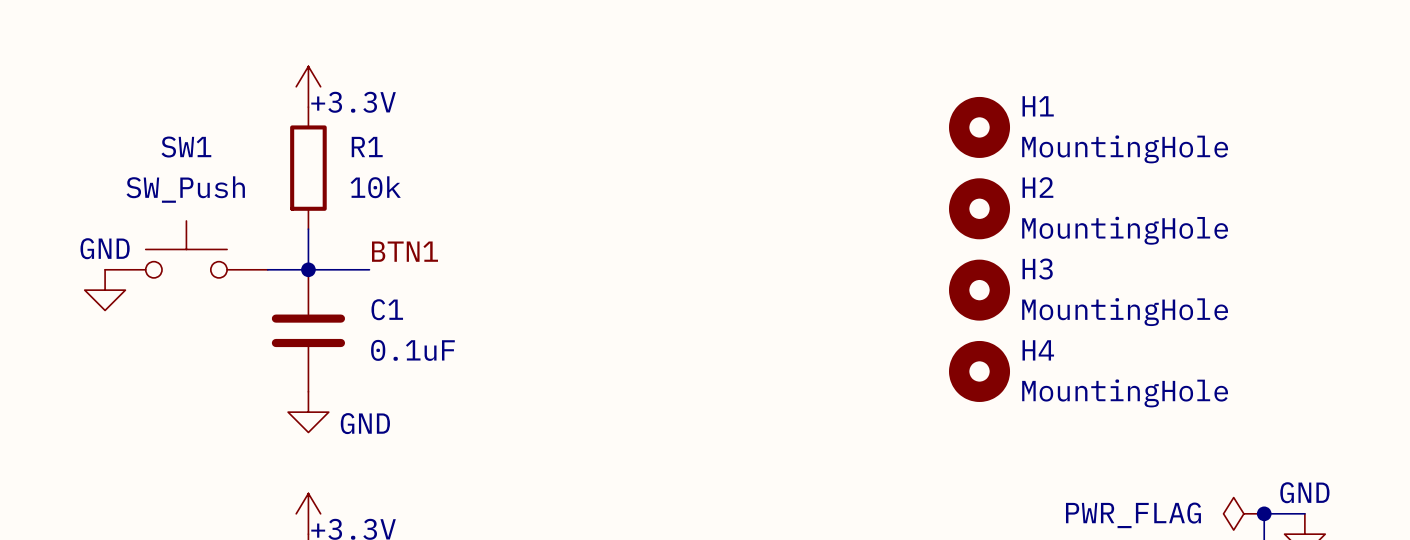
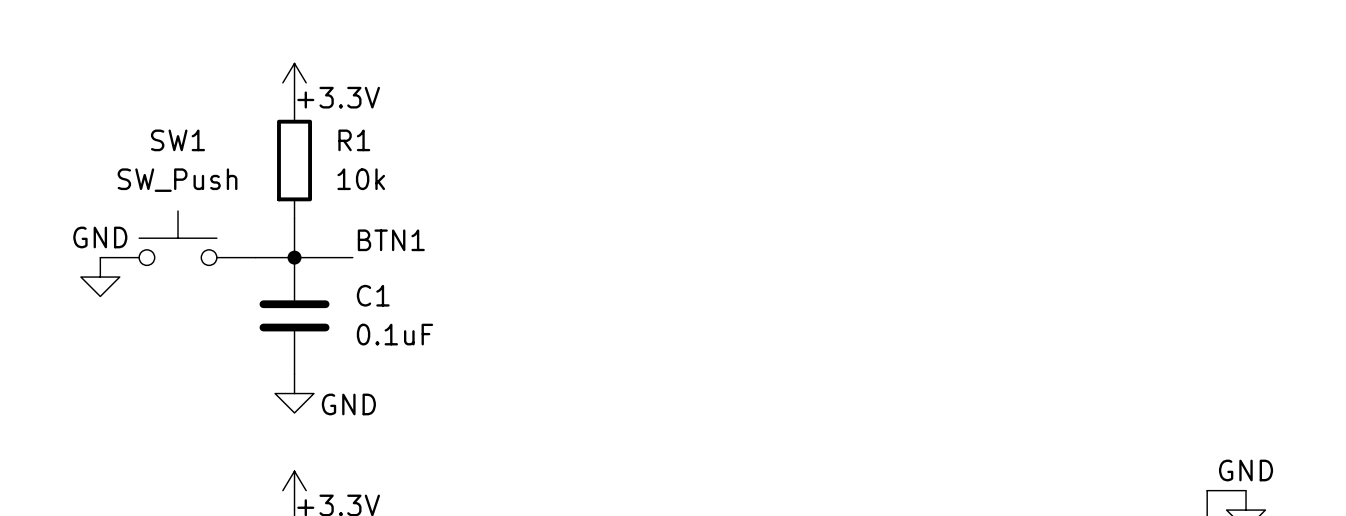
H1: MountingHole (979, 127) -> none
H2: MountingHole (979, 208) -> none
H3: MountingHole (979, 290) -> none
H4: MountingHole (979, 371) -> none
power symbol: PWR_FLAG (1243, 513) -> none
junction: (1264, 513) -> none

